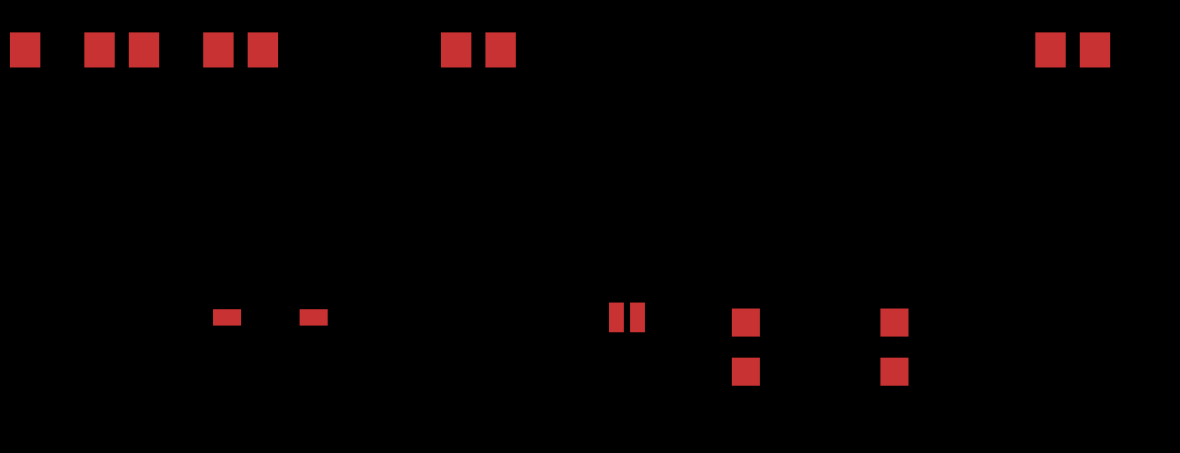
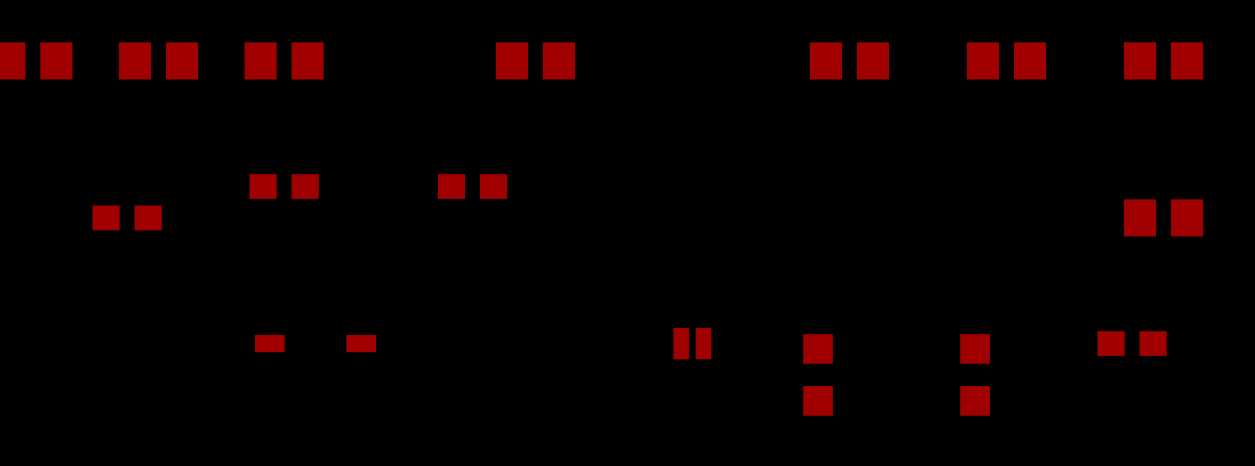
part: none -> (849, 60)
part: none -> (1006, 60)
part: none -> (284, 186)
part: none -> (472, 186)
part: none -> (127, 217)
part: none -> (1163, 217)
part: none -> (1132, 343)

